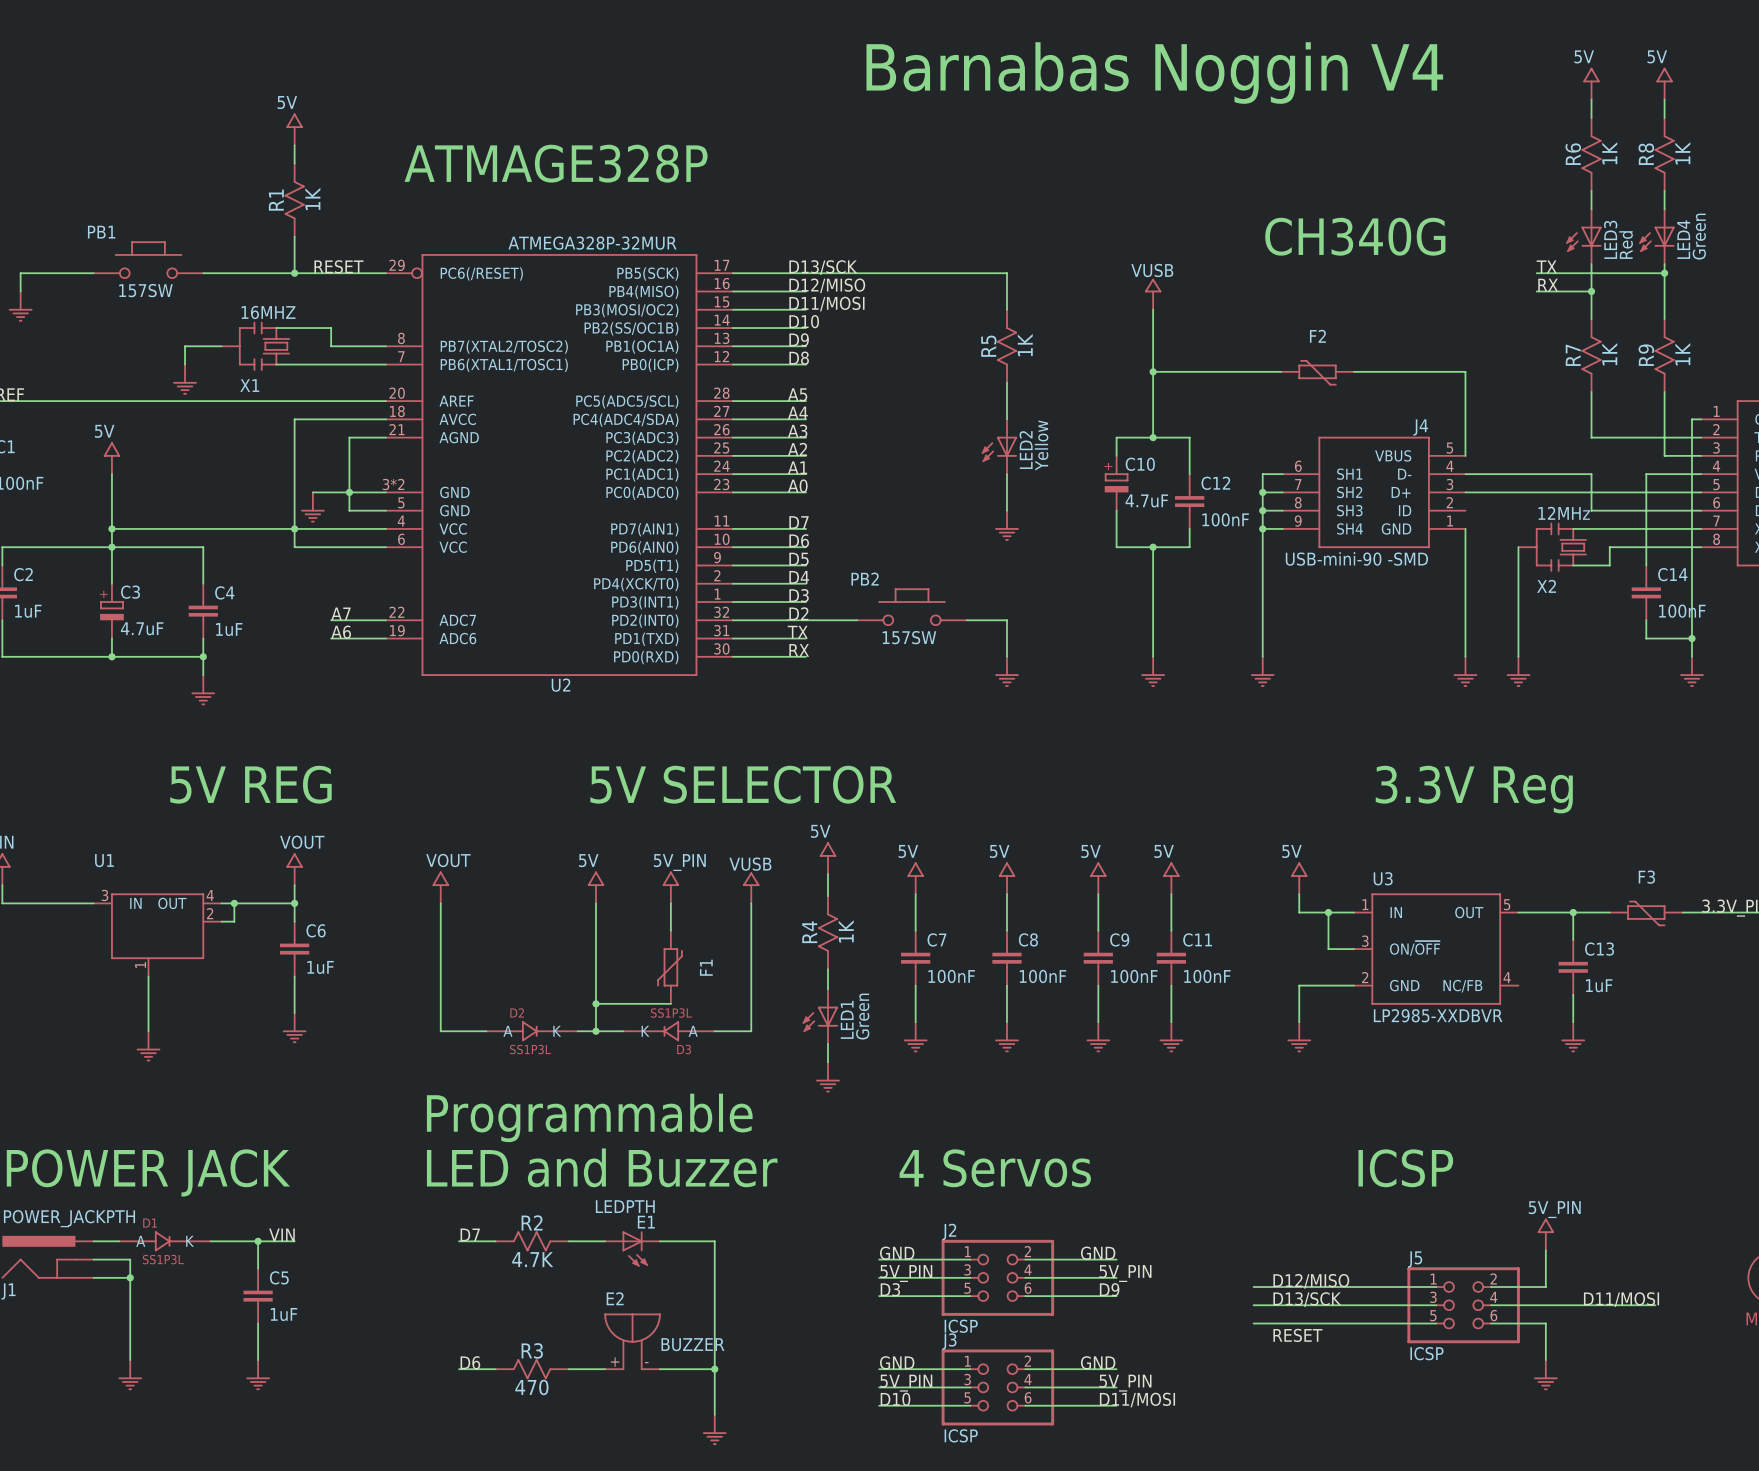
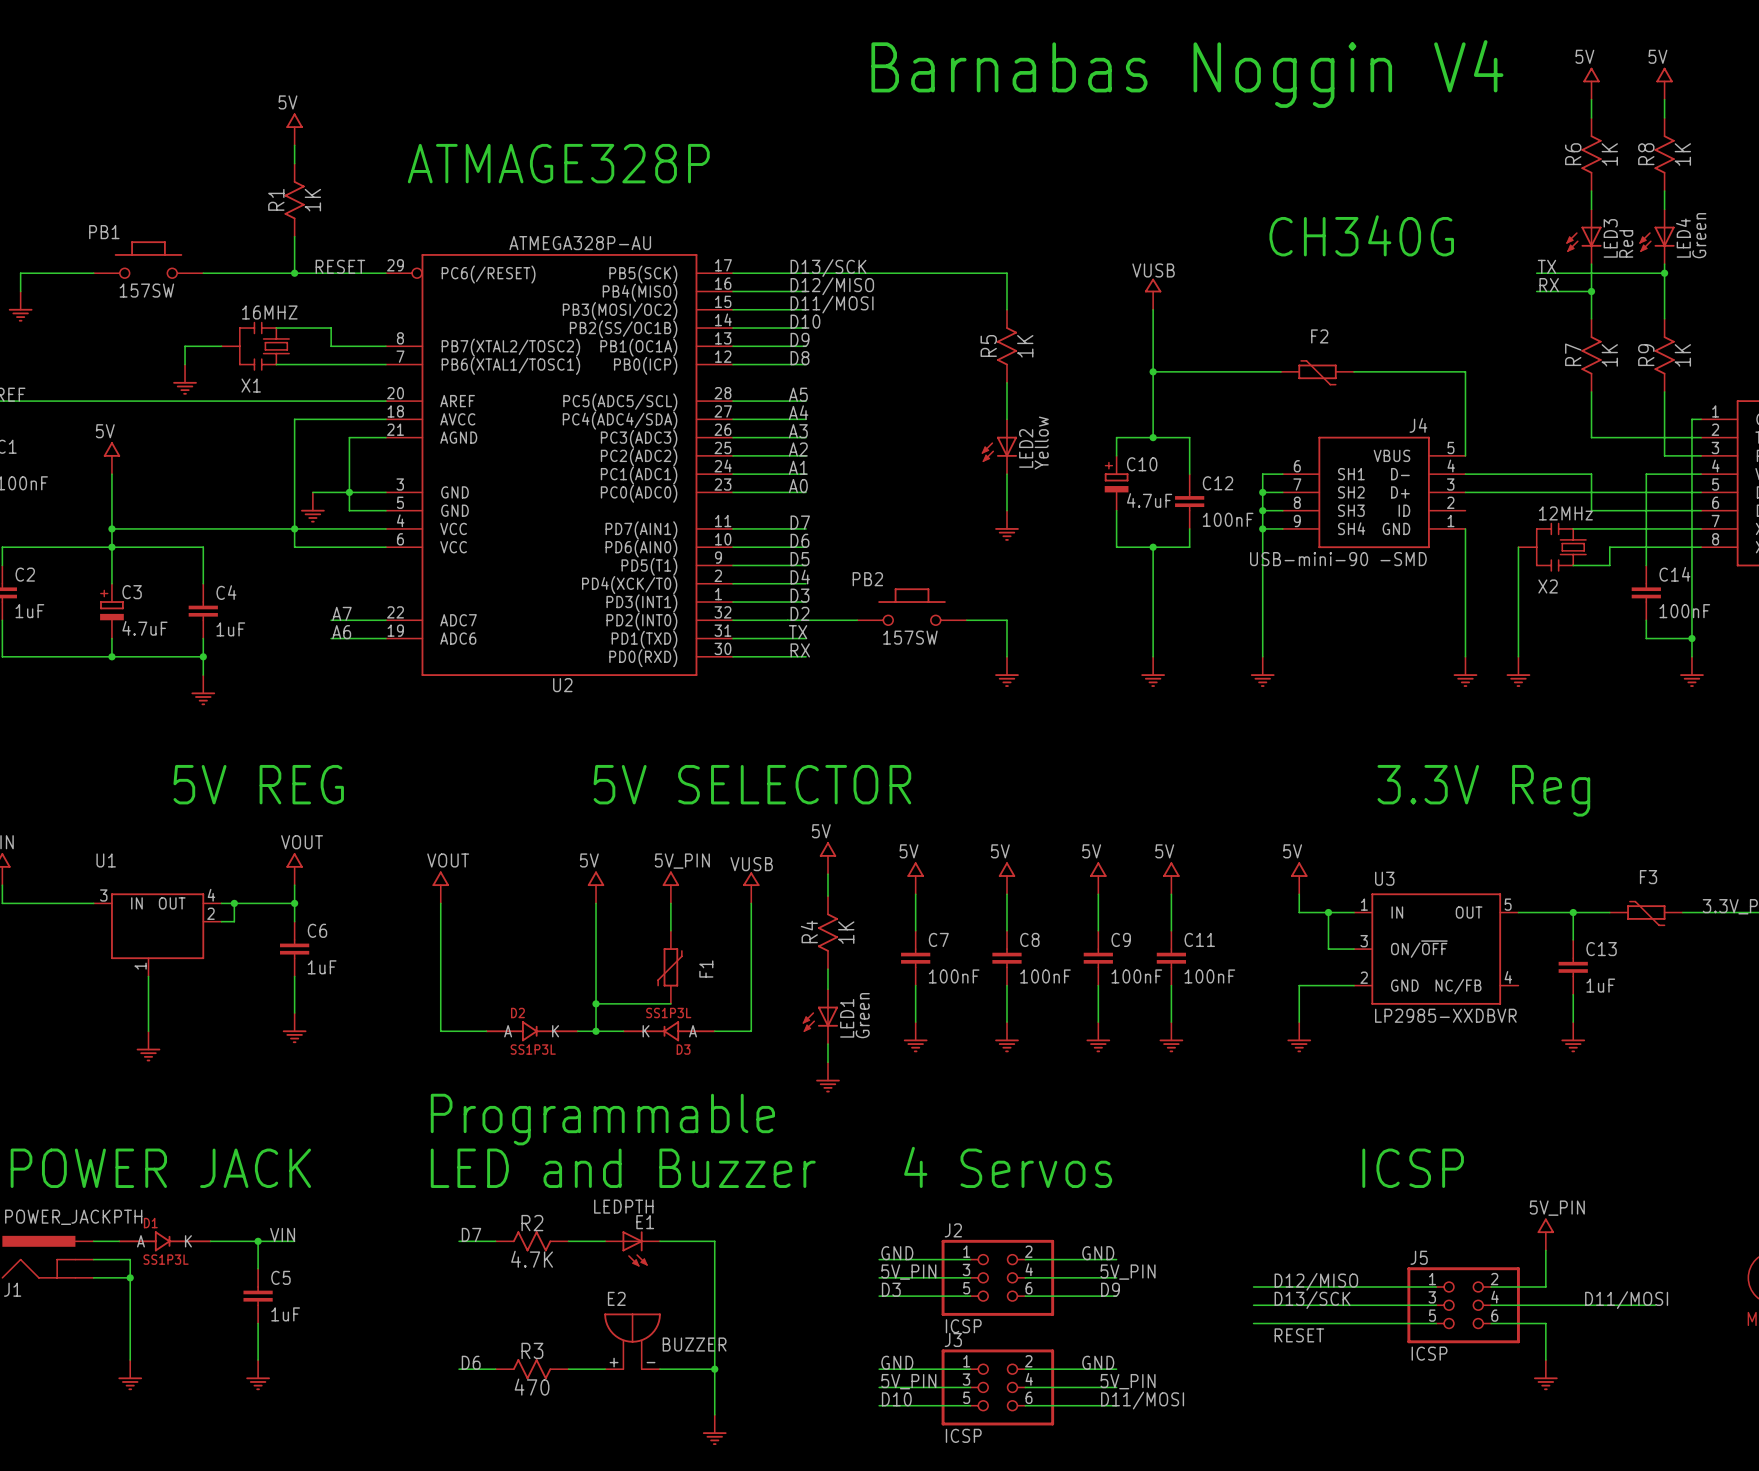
U2 value: ATMEGA328P-32MUR (592, 243) -> ATMEGA328P-AU (580, 243)
U2 pin number: 3*2 (393, 484) -> 3 (400, 484)

